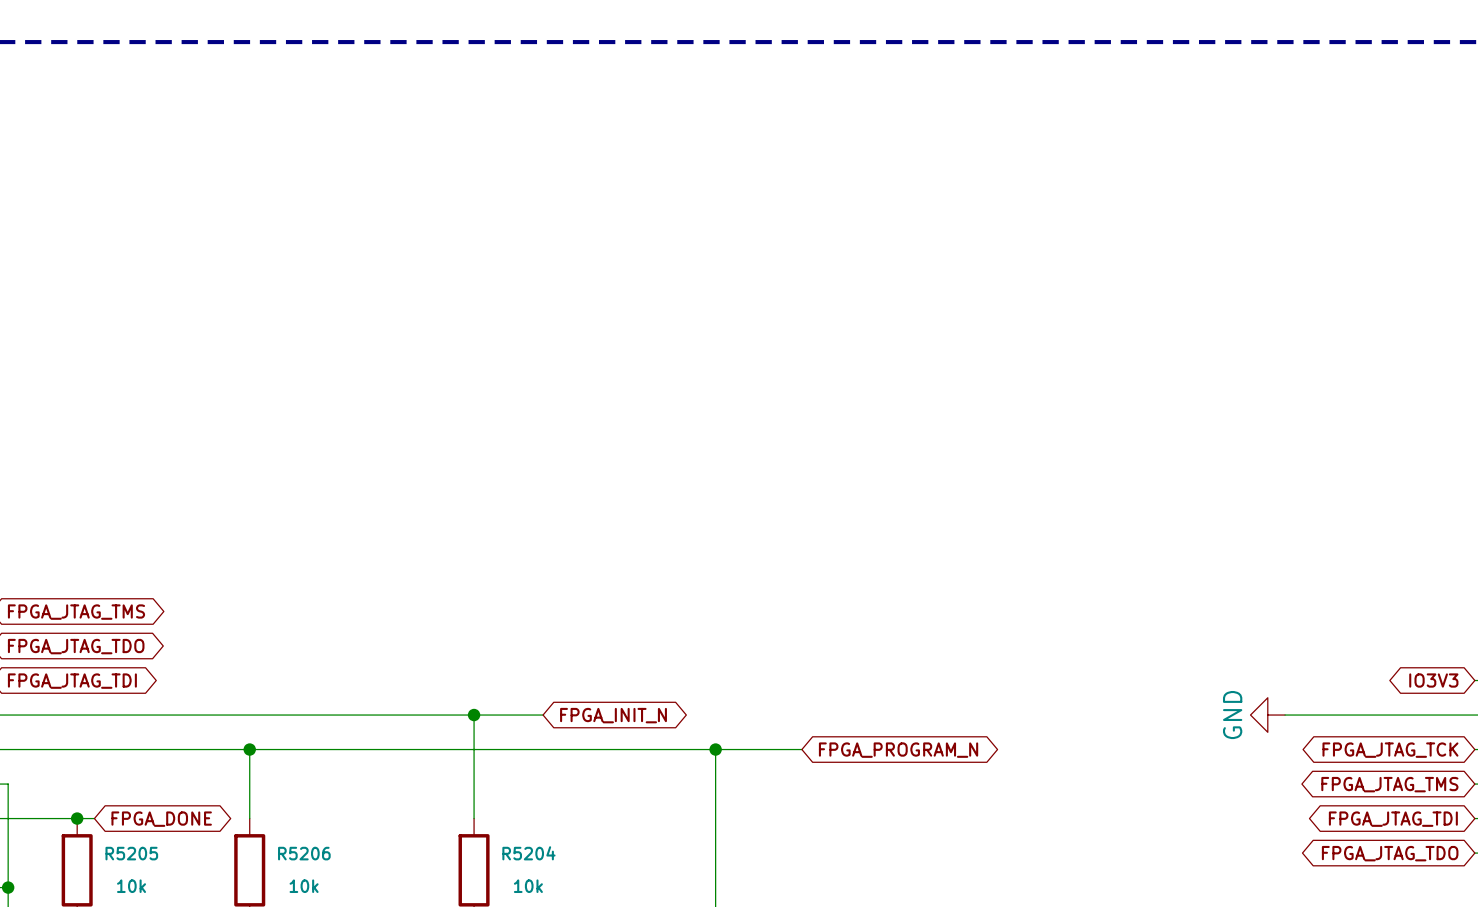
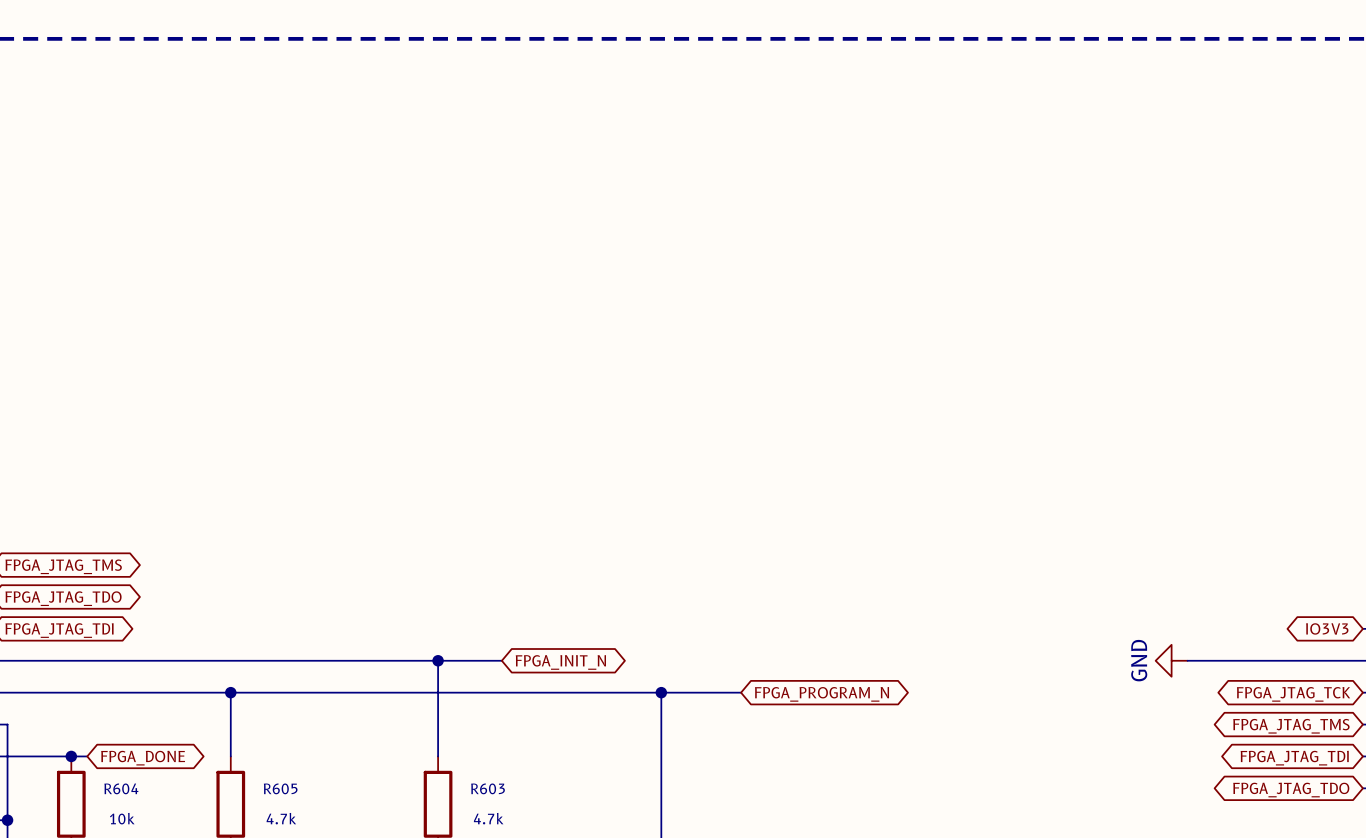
R5205 name: R5205 (131, 853) -> R604 (121, 788)
R5206 name: R5206 (304, 853) -> R605 (280, 788)
R5204 name: R5204 (528, 853) -> R603 (488, 788)
R5206 value: 10k (304, 886) -> 4.7k (281, 818)
R5204 value: 10k (528, 886) -> 4.7k (488, 818)

